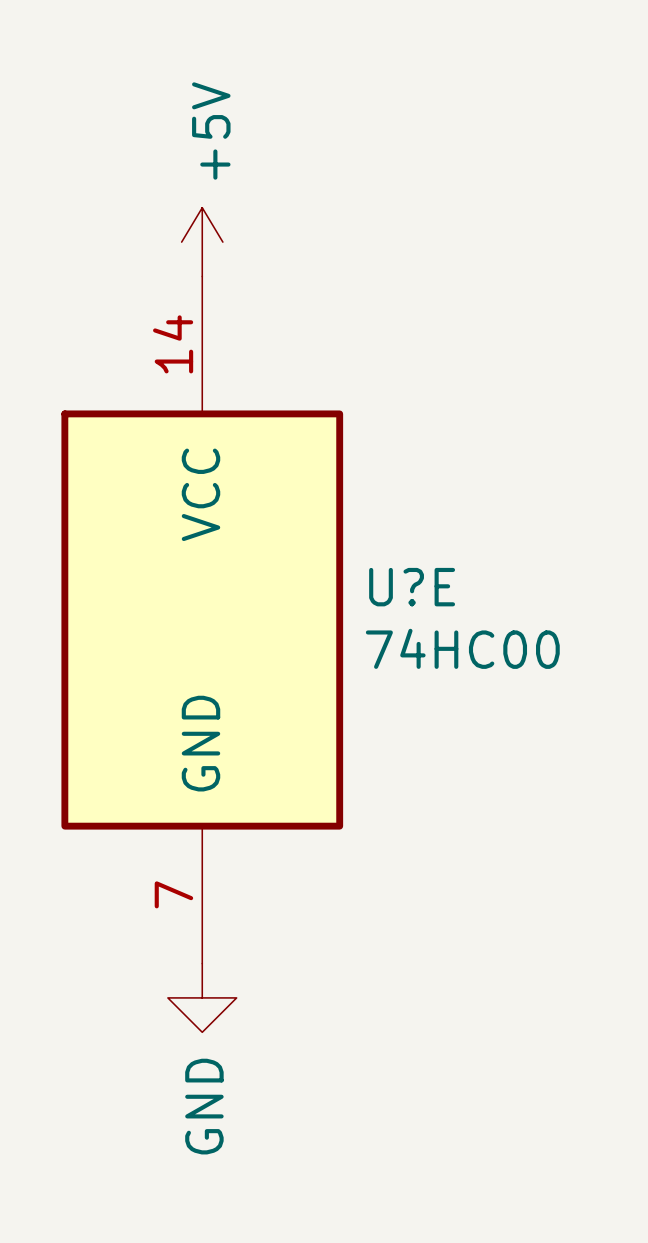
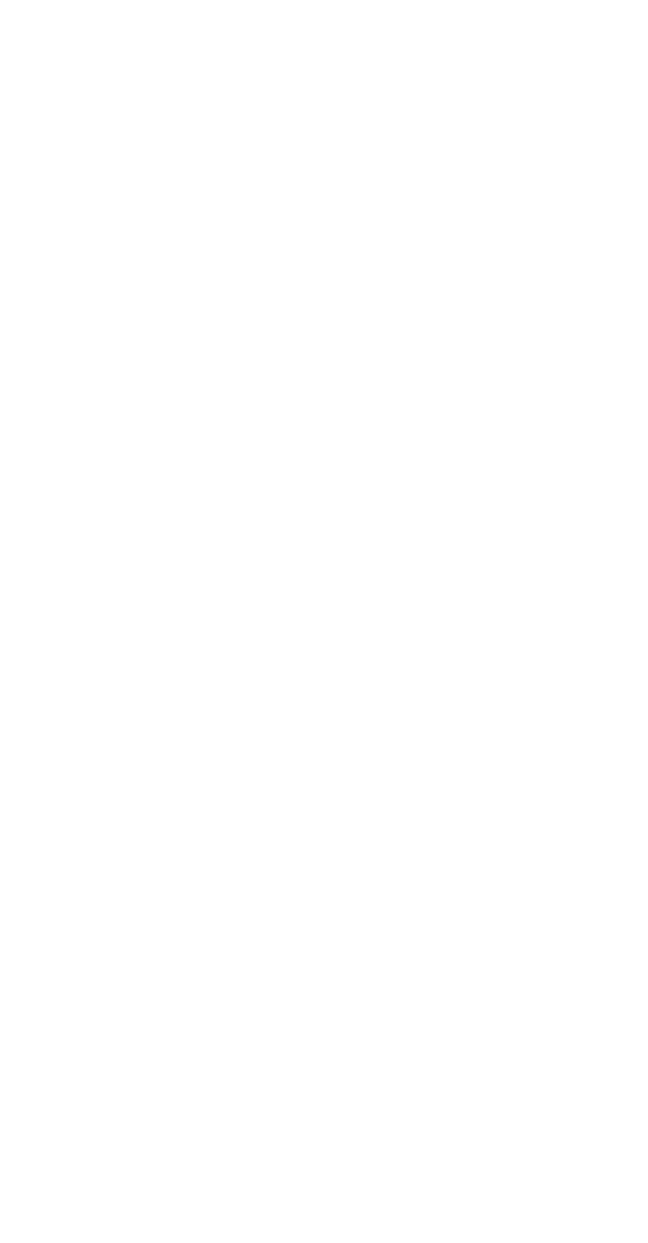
power symbol: +5V (202, 242) -> none
U?E: 74HC00 (202, 620) -> none
power symbol: GND (202, 997) -> none

